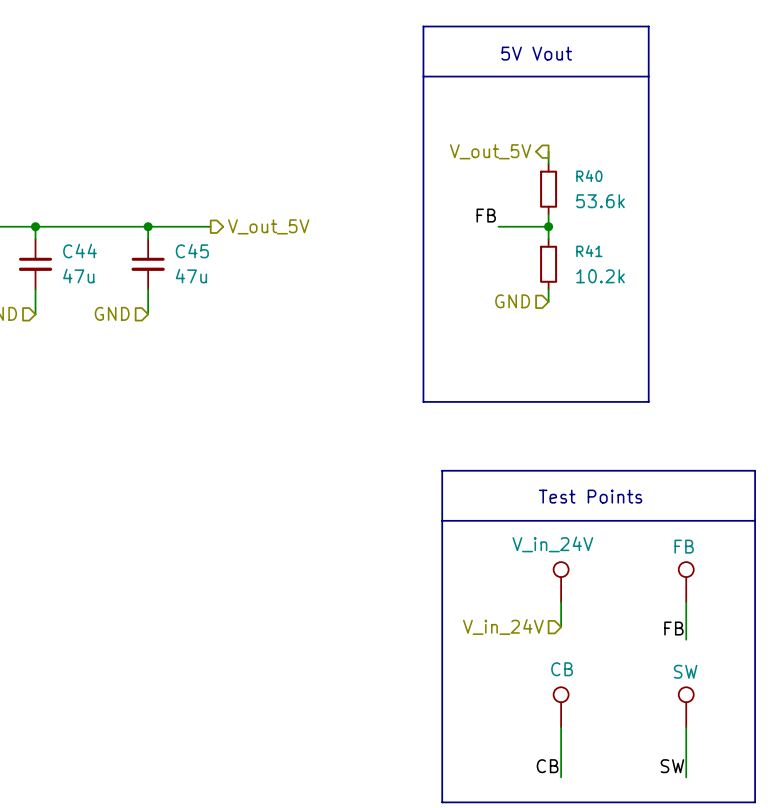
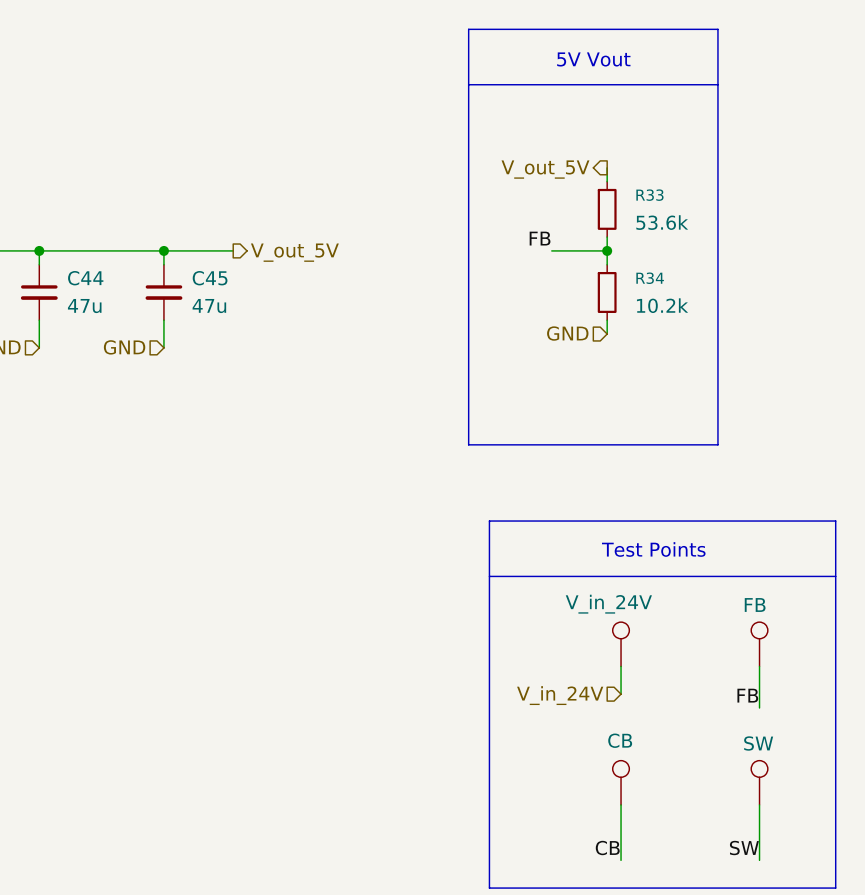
R40 name: R40 (589, 176) -> R33 (649, 195)
R41 name: R41 (589, 251) -> R34 (650, 278)

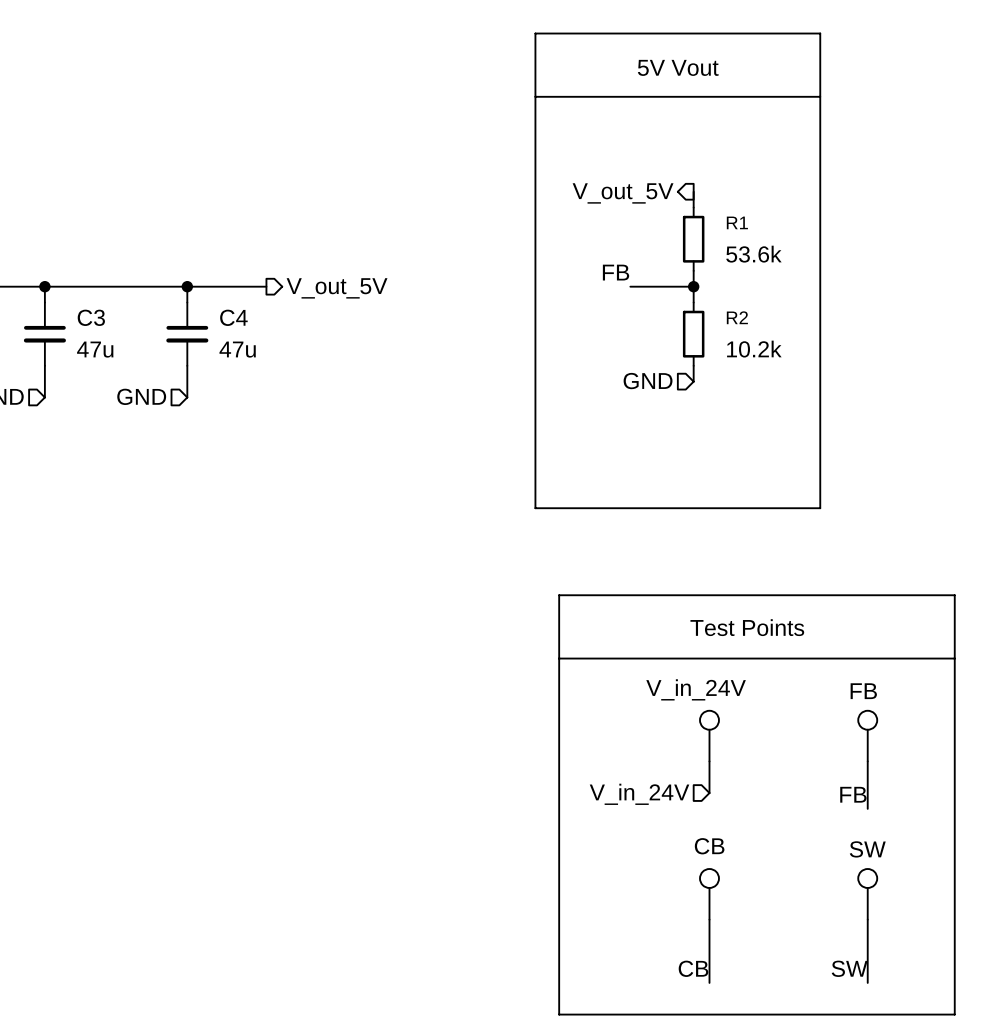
R33 name: R33 (649, 195) -> R1 (737, 222)
C44 name: C44 (85, 278) -> C3 (91, 317)
C45 name: C45 (210, 278) -> C4 (233, 317)
R34 name: R34 (650, 278) -> R2 (737, 317)

